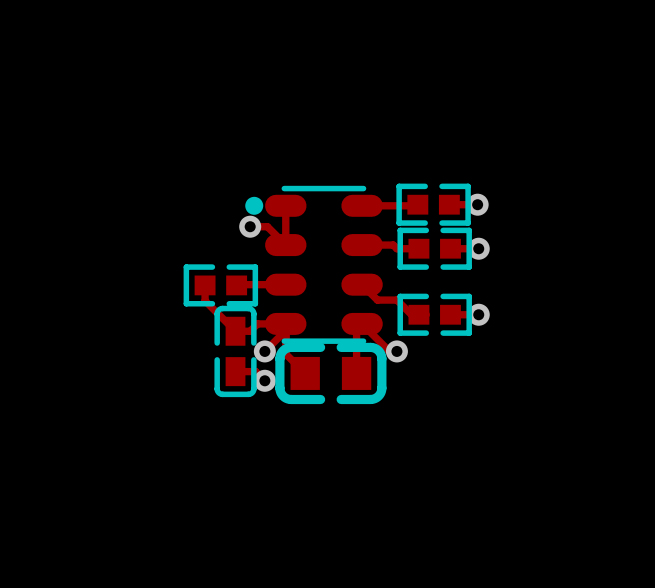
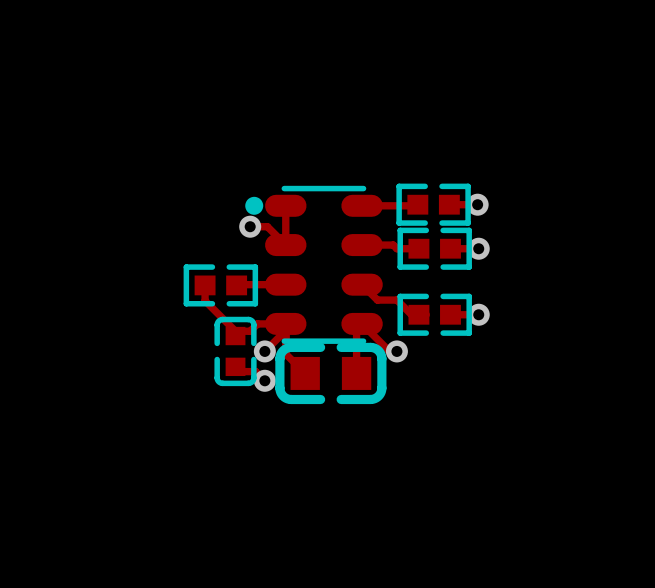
part footprint: [214, 305, 257, 398] -> [214, 316, 257, 387]

